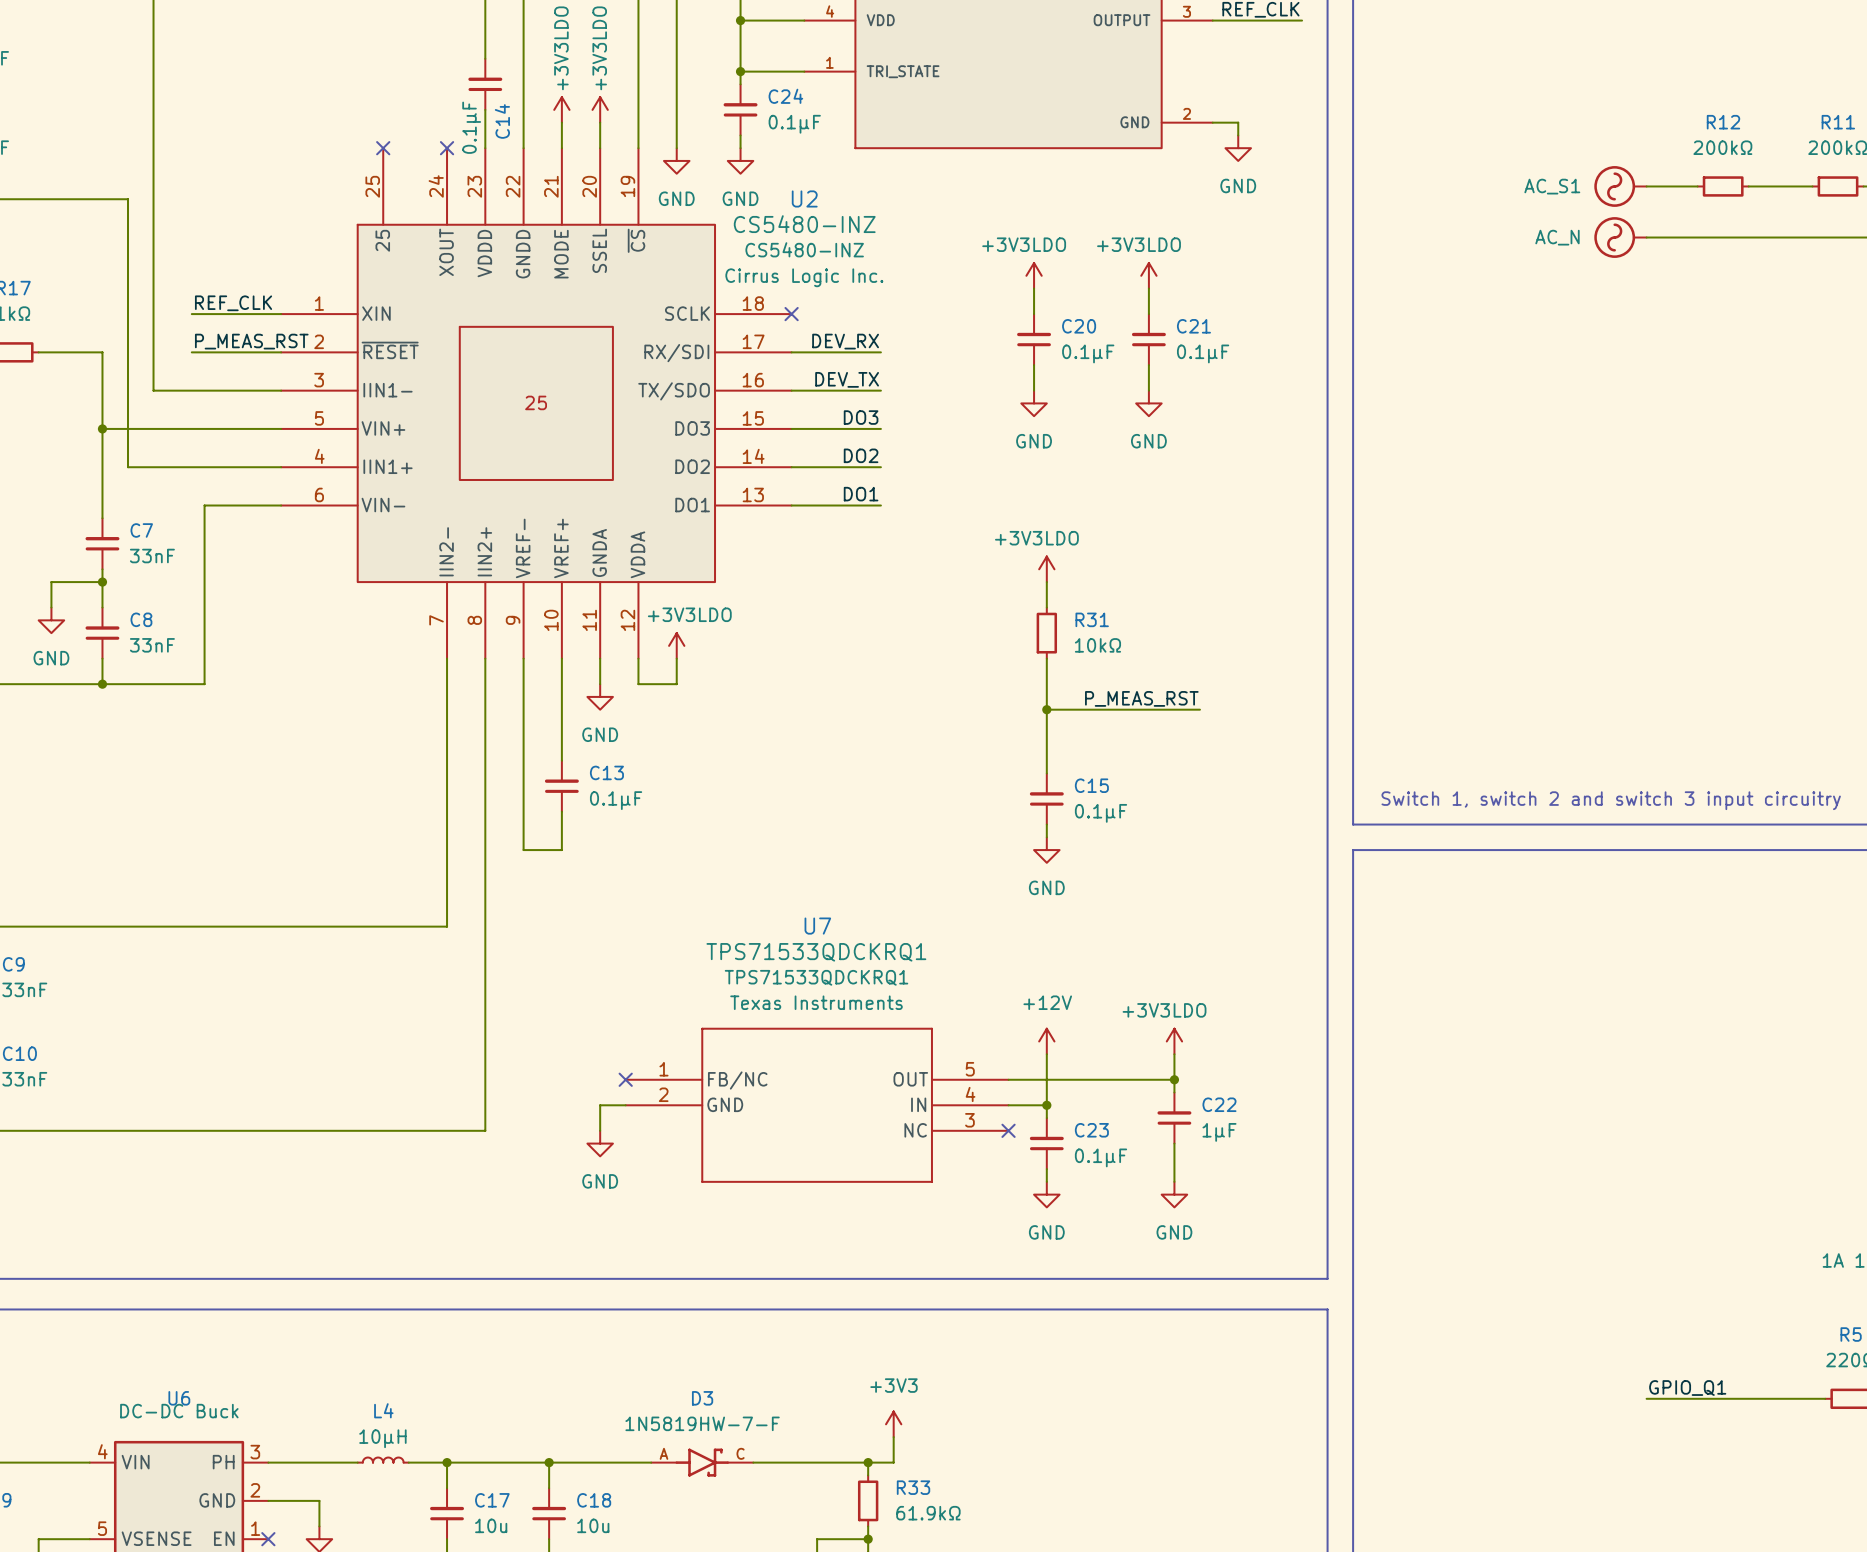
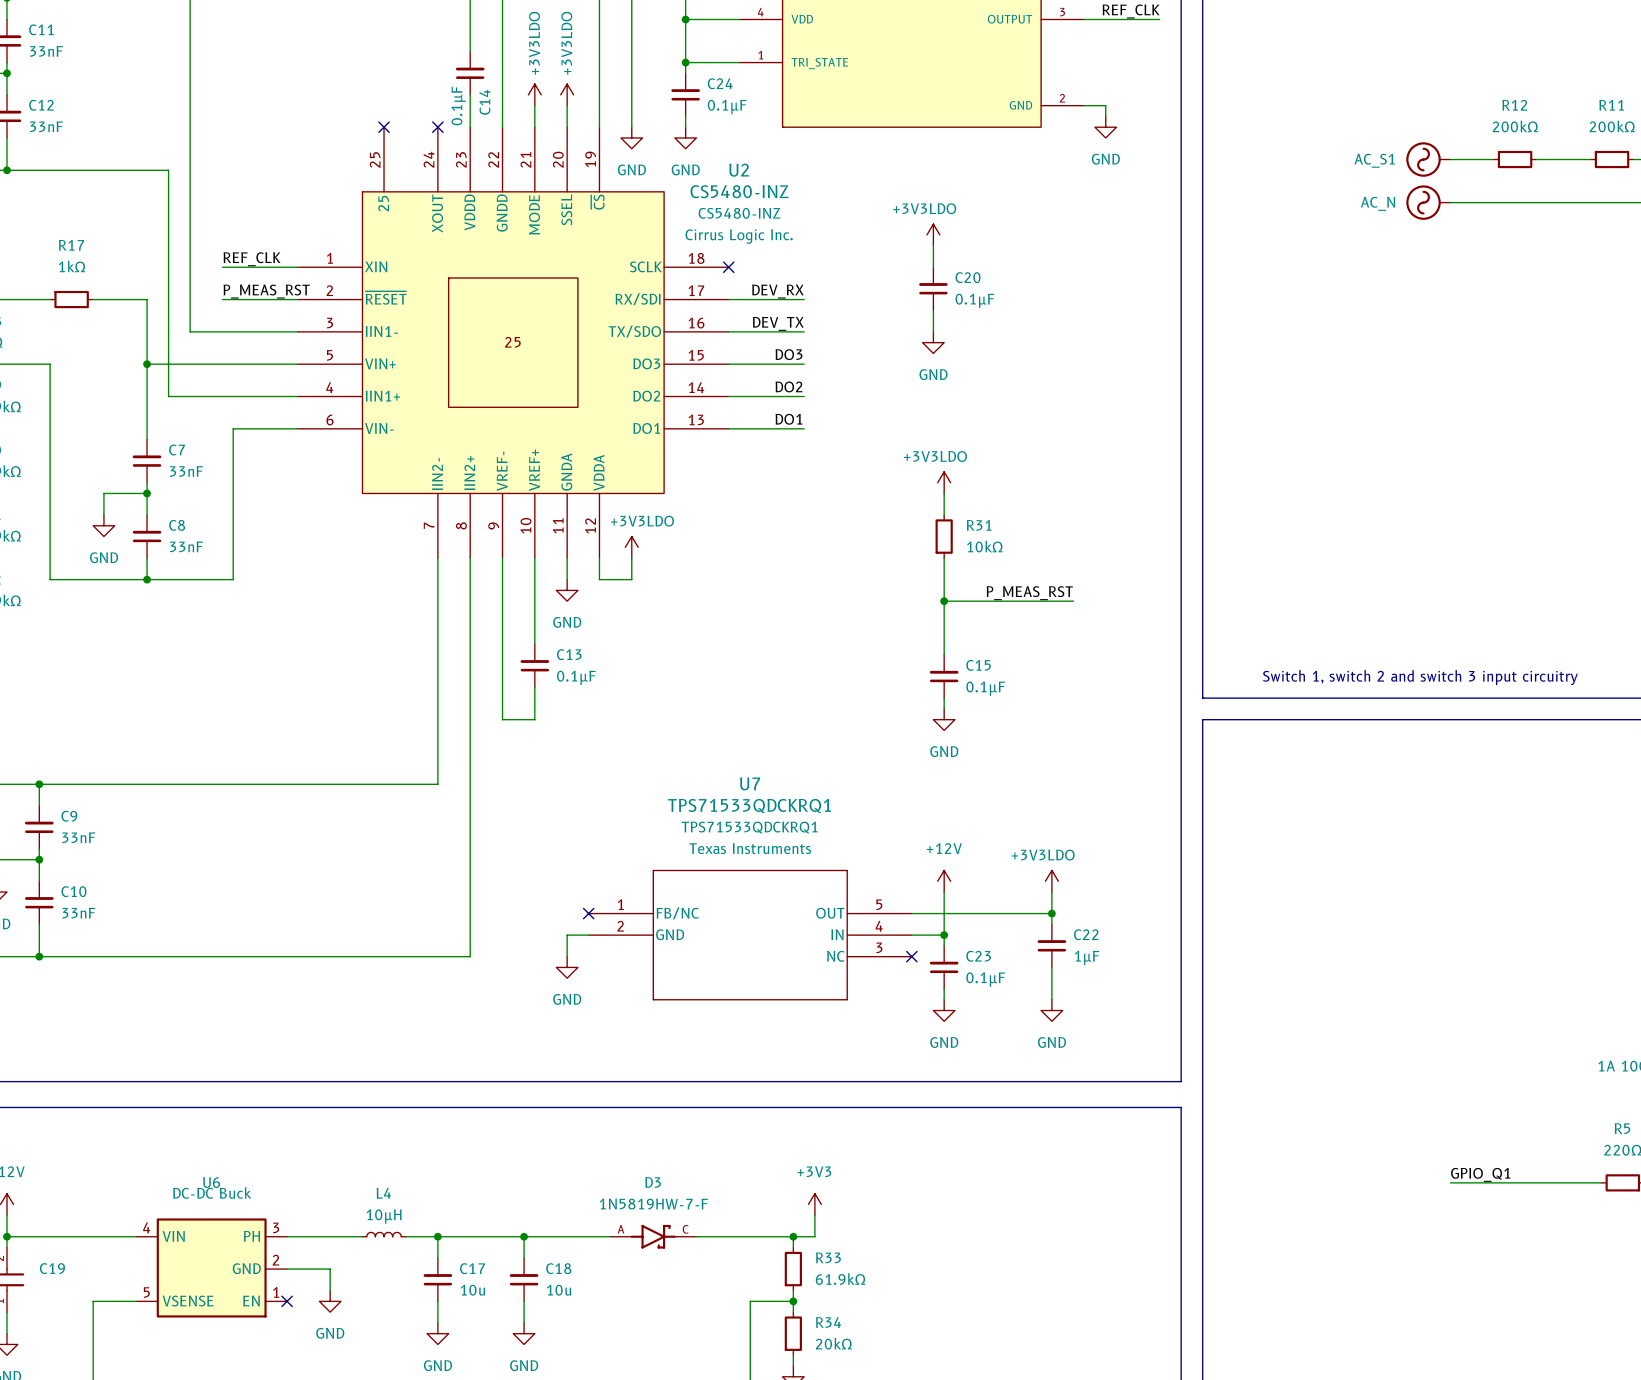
power symbol: +3V3LDO (1148, 275) -> none
wire: (1148, 288) (1148, 314) -> none
C21: (1148, 339) -> none
wire: (1148, 365) (1148, 390) -> none
power symbol: GND (1148, 403) -> none

